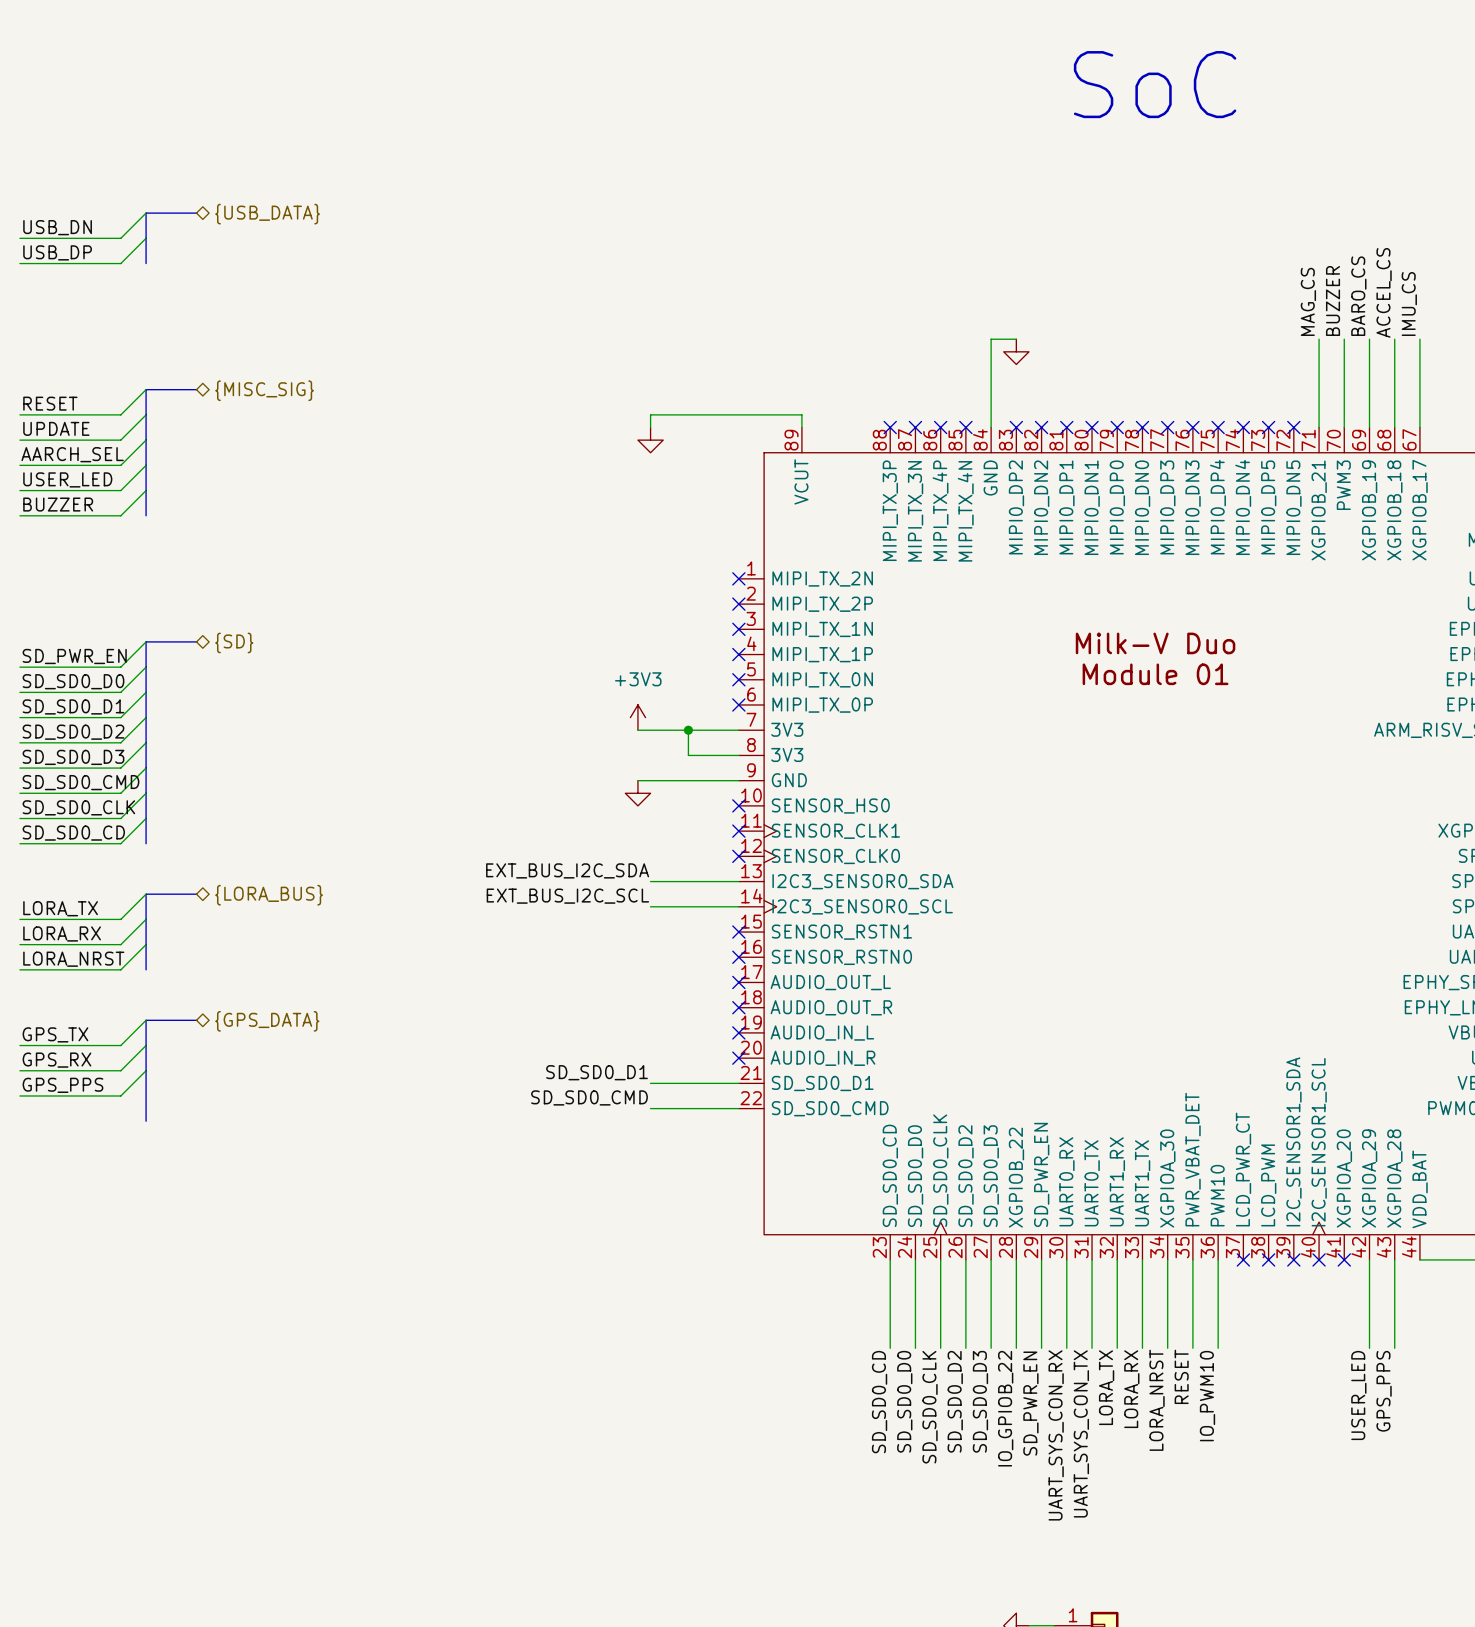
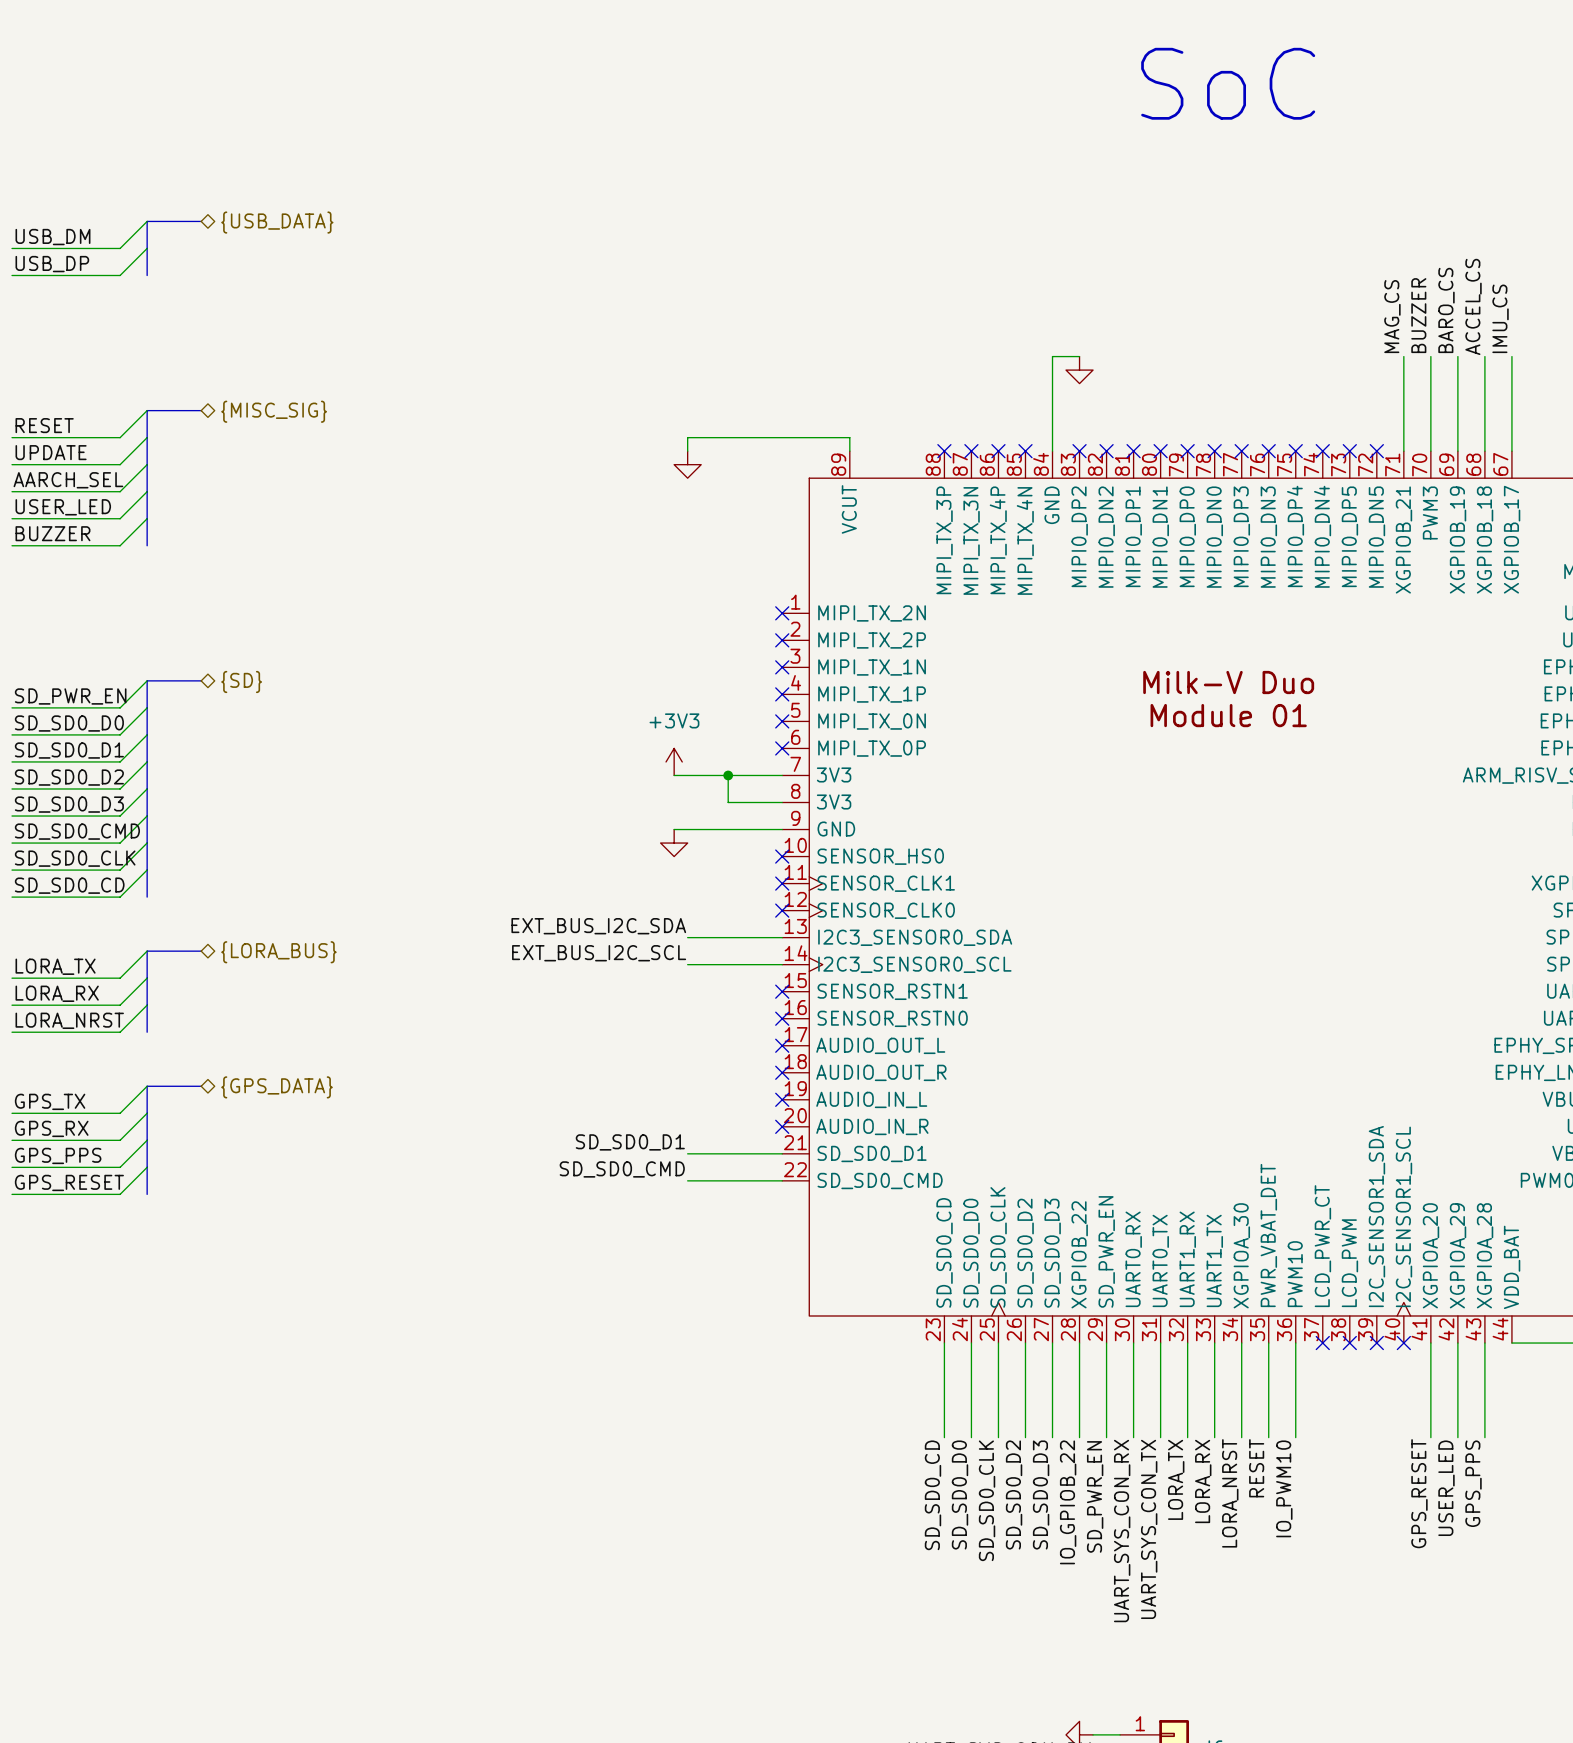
label: USB_DN (57, 227) -> USB_DM (52, 237)
wire: none -> (147, 1167) (120, 1194) (12, 1194)
label: none -> GPS_RESET (69, 1182)
wire: none -> (1430, 1343) (1430, 1437)
no-connect mark: (1344, 1259) -> none
label: none -> GPS_RESET (1419, 1493)

